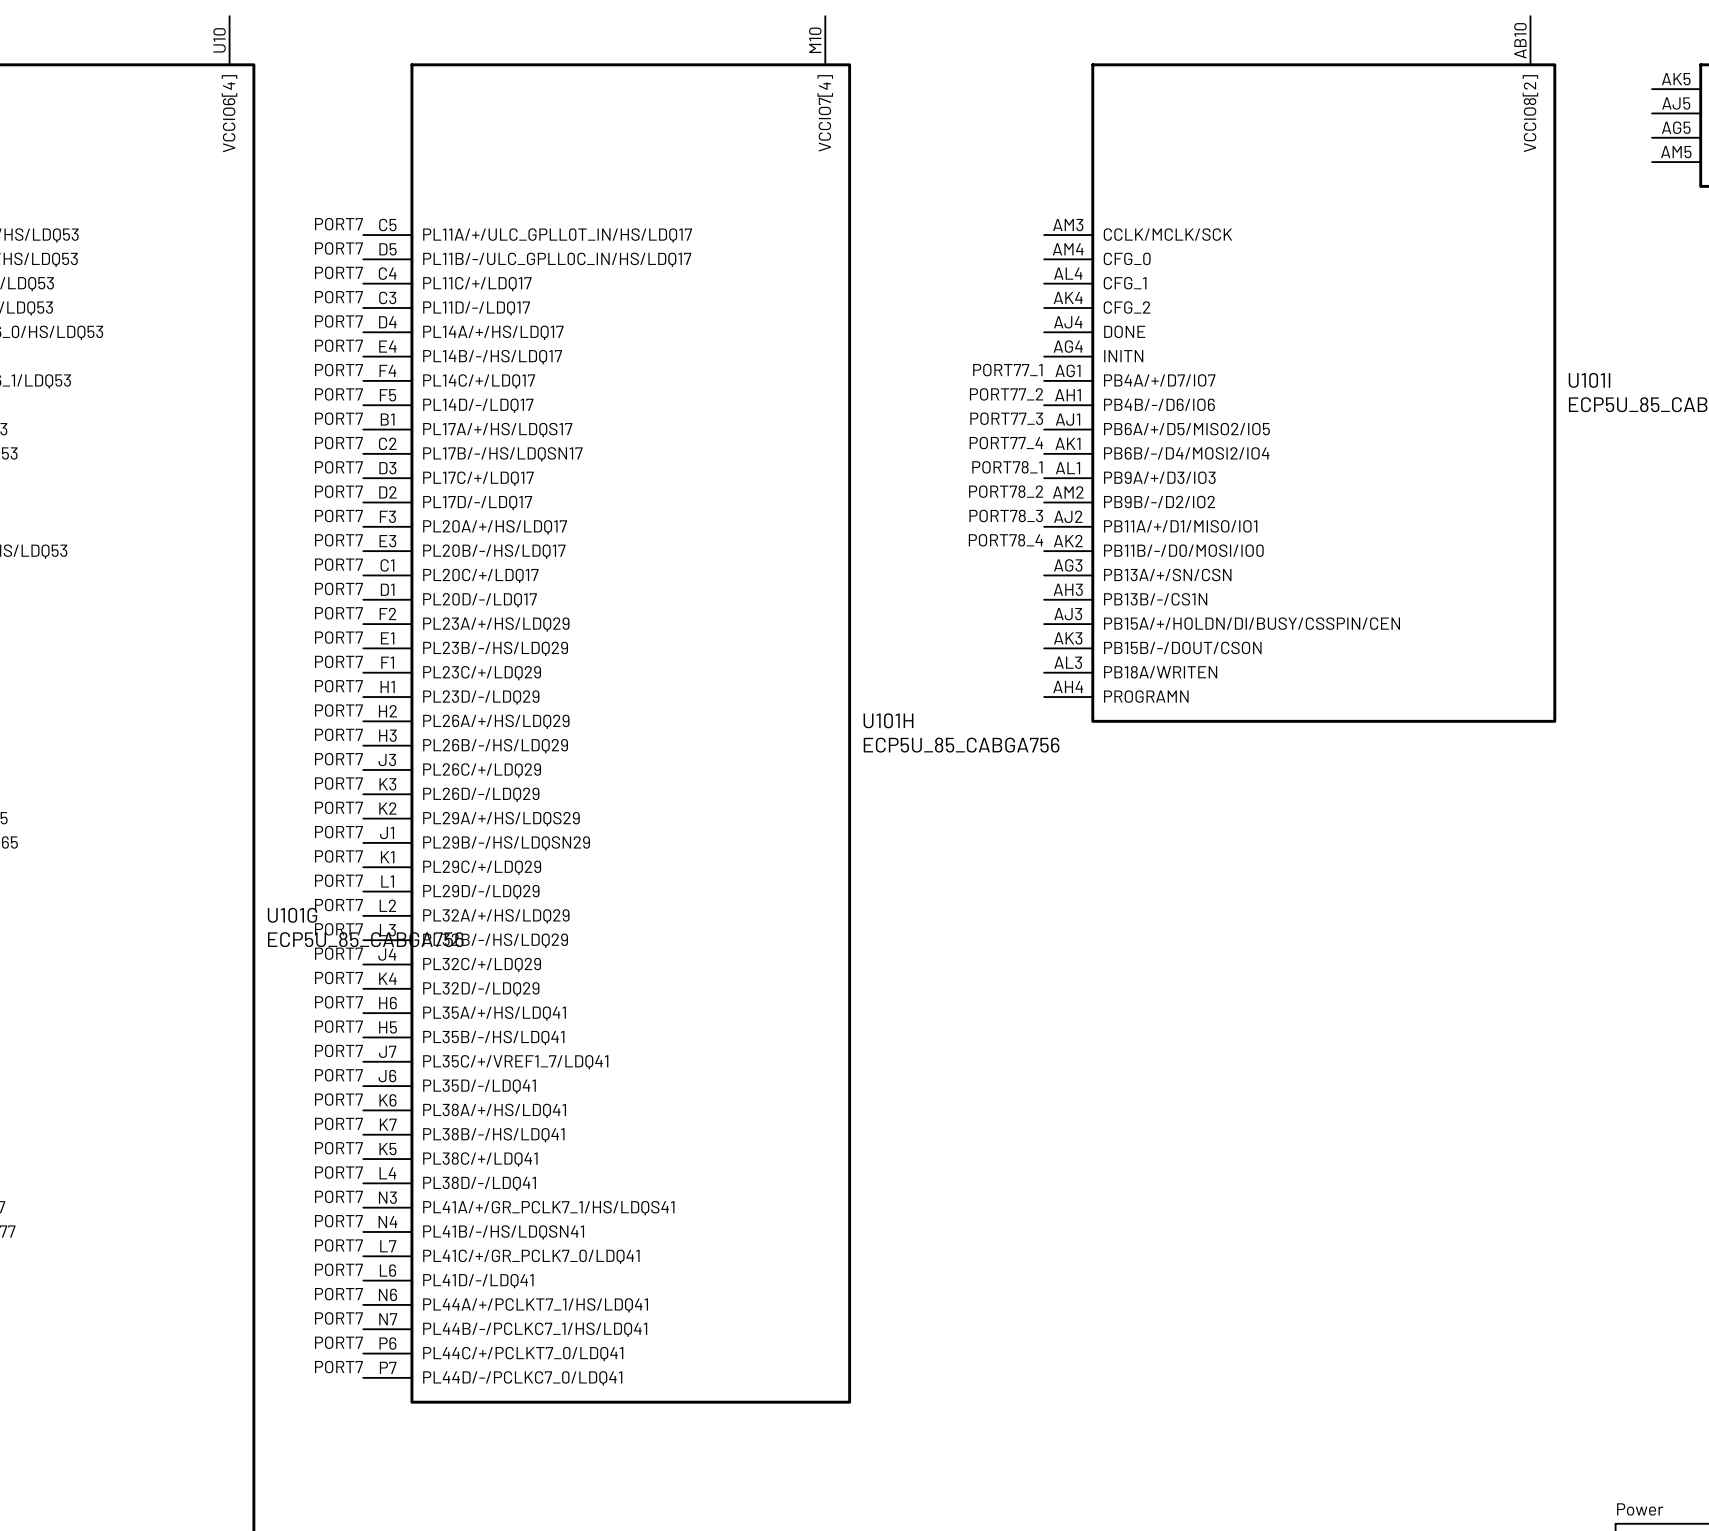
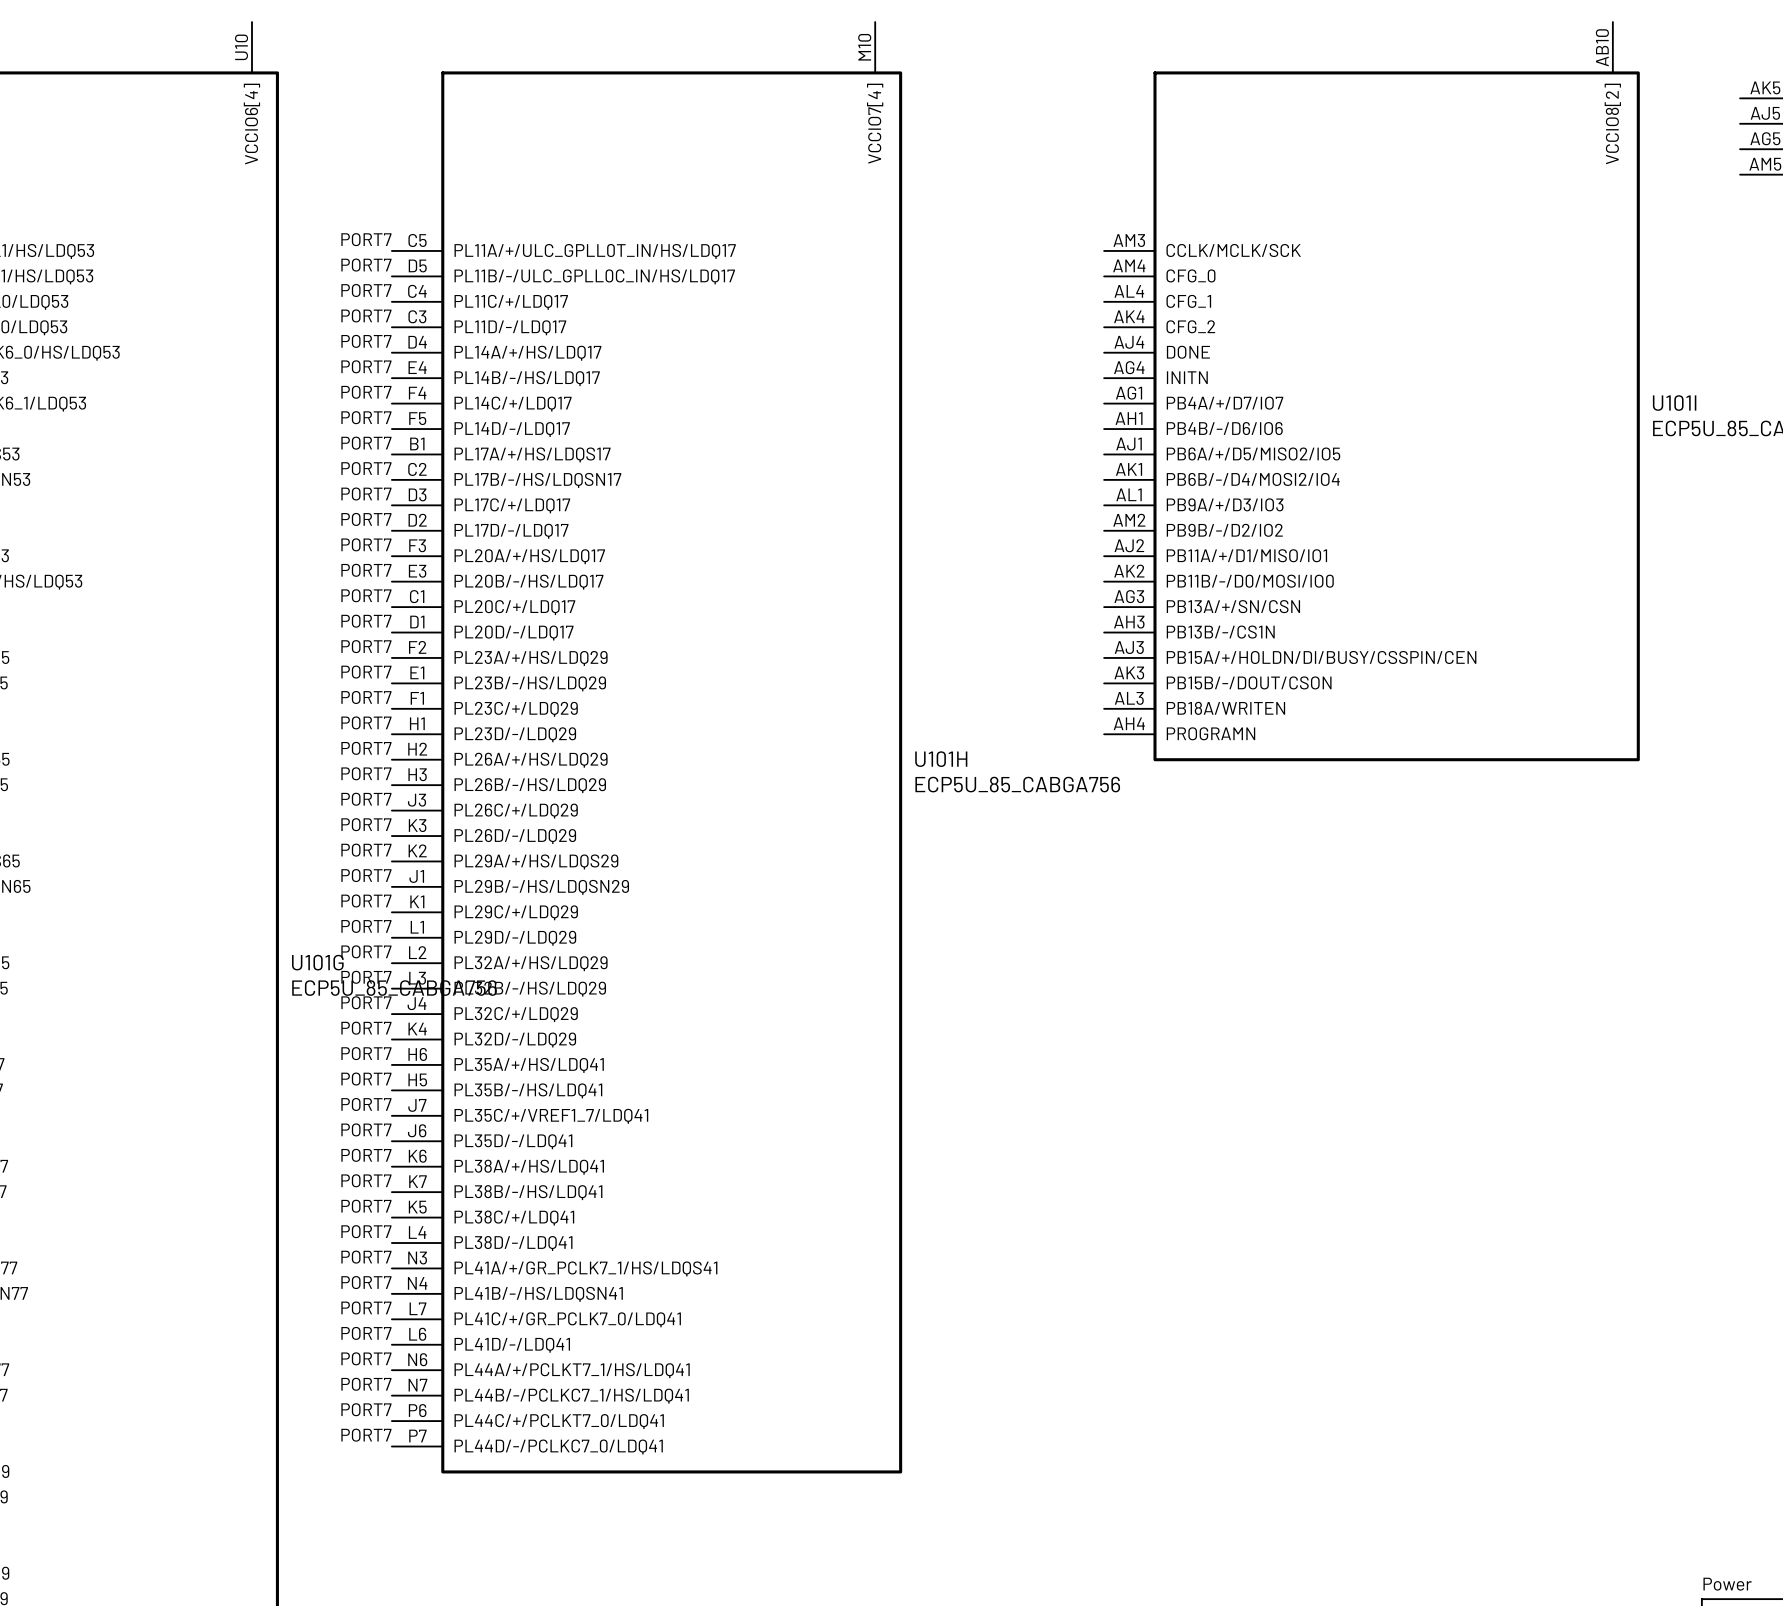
label: PORT77_1 (1007, 370) -> none
label: PORT77_2 (1006, 394) -> none
label: PORT77_3 (1006, 418) -> none
label: PORT77_4 (1006, 443) -> none
label: PORT78_1 (1007, 467) -> none
label: PORT78_2 (1006, 491) -> none
label: PORT78_3 (1006, 515) -> none
label: PORT78_4 (1005, 540) -> none

